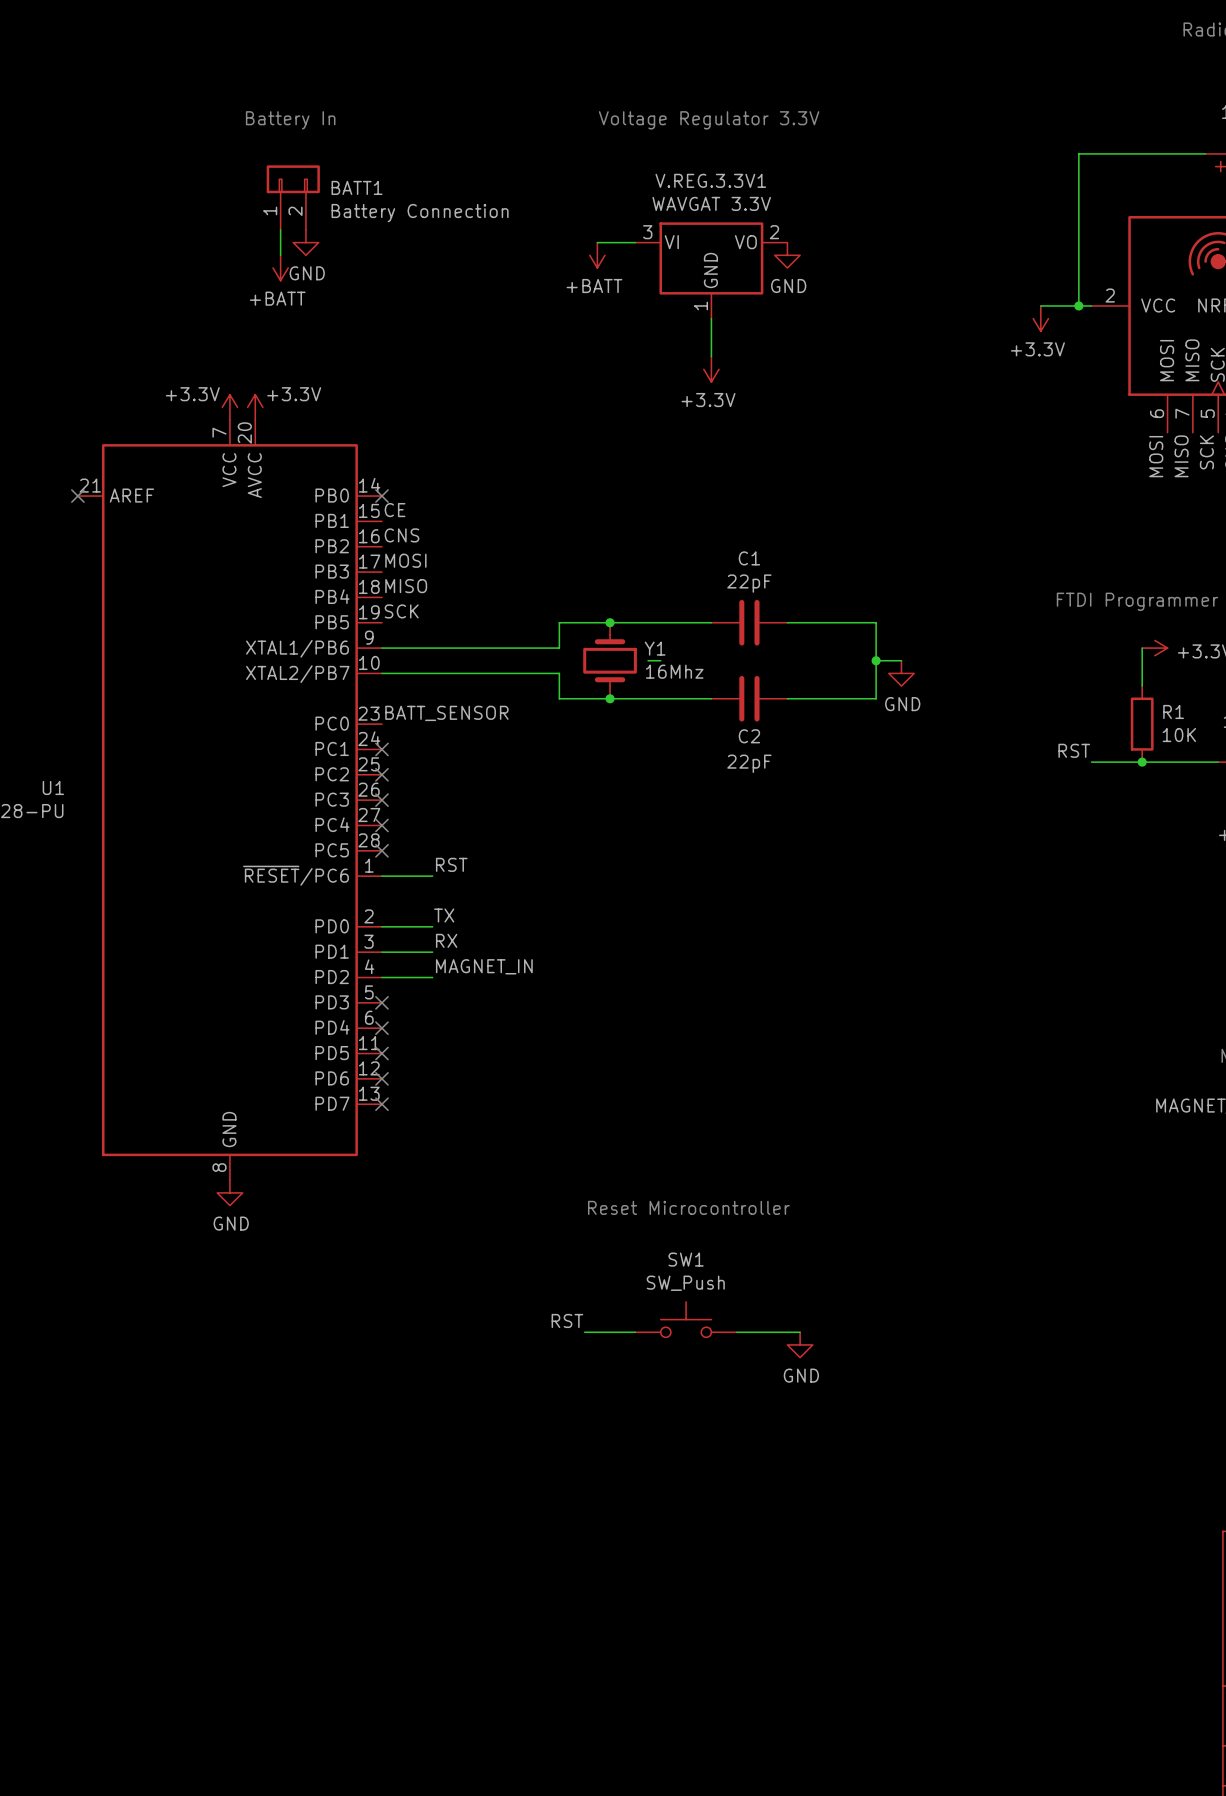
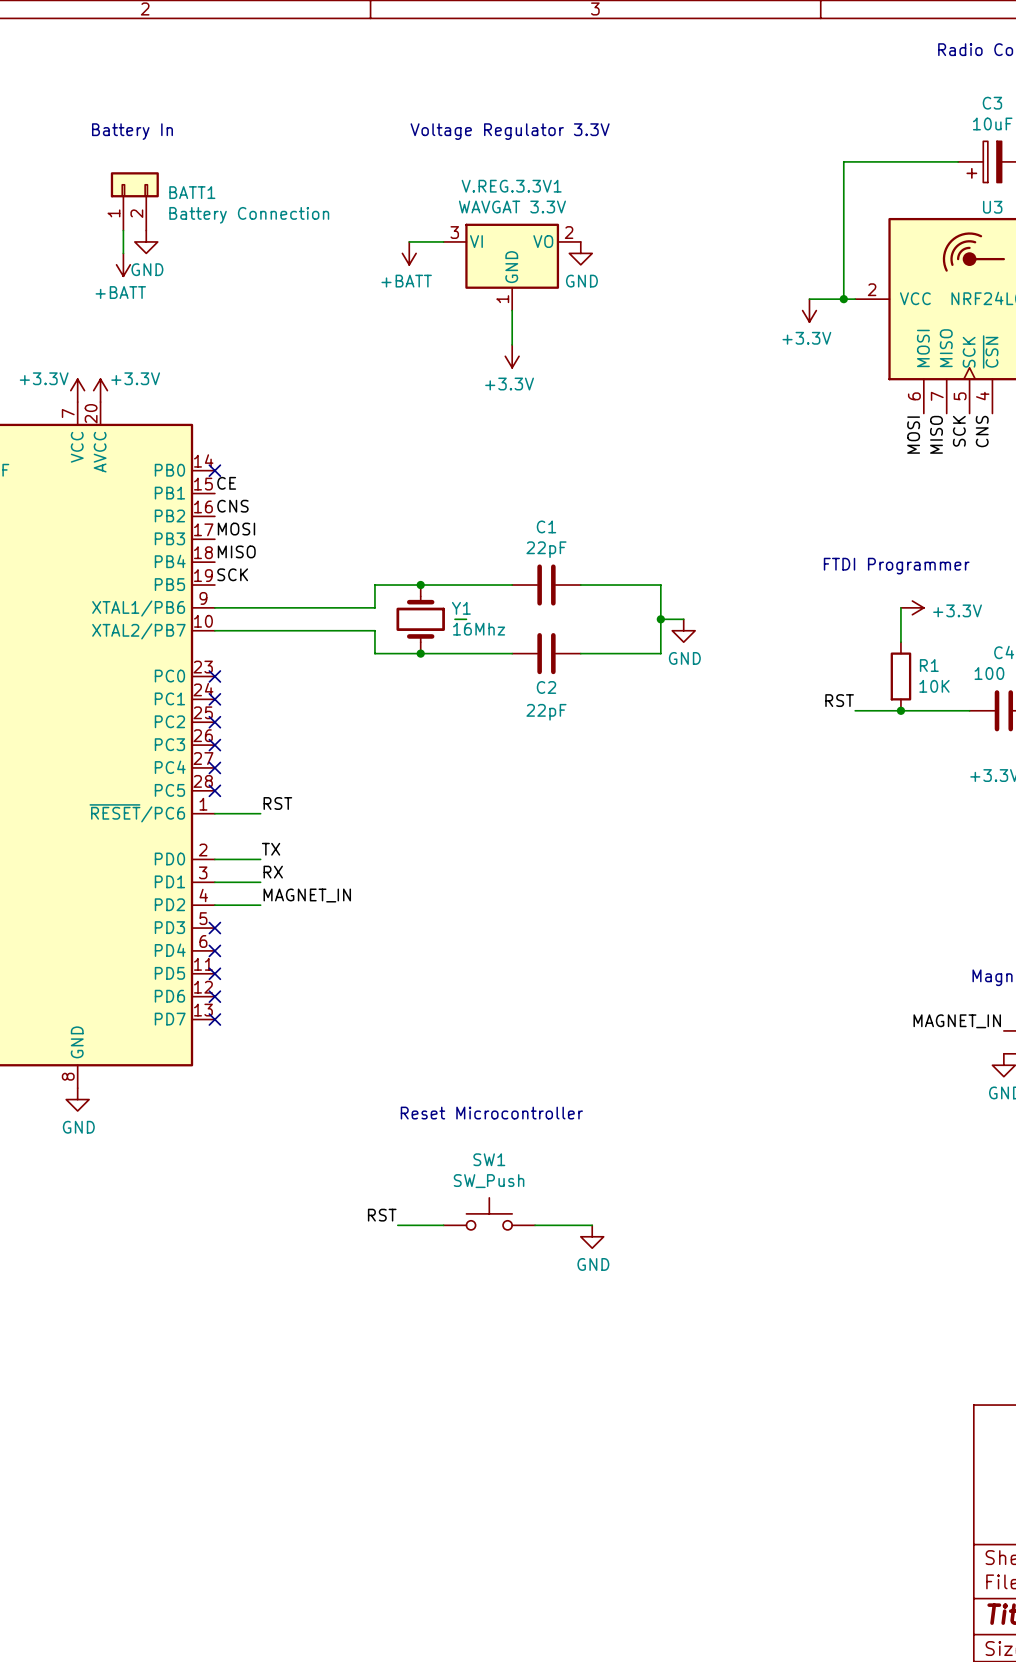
label: BATT_SENSOR (446, 713) -> none
no-connect mark: none -> (214, 676)

